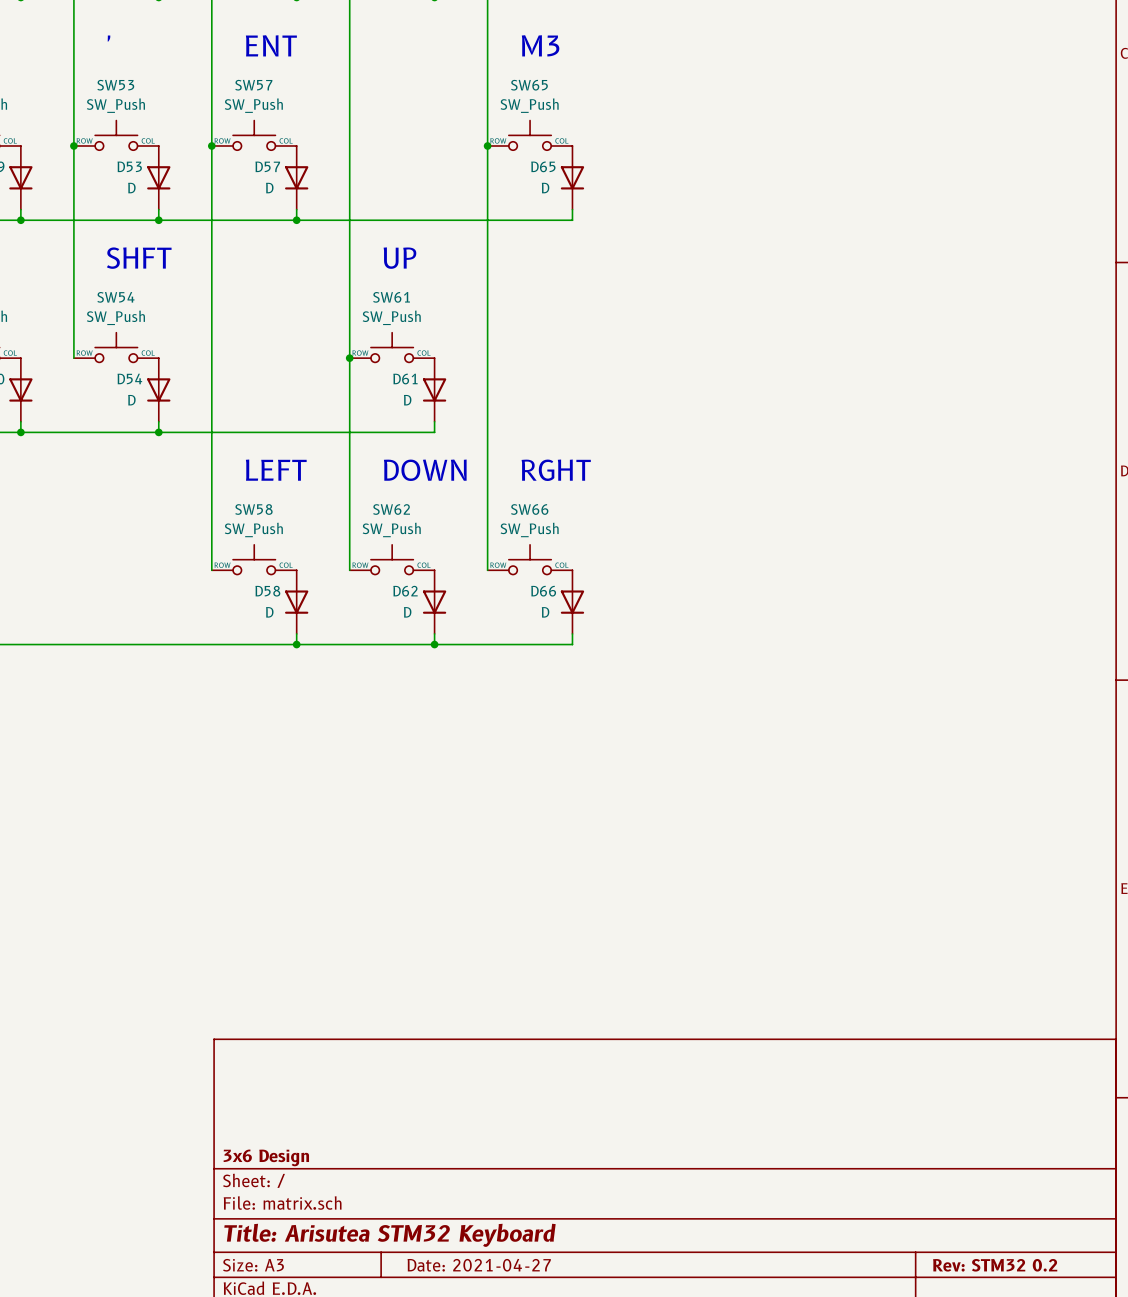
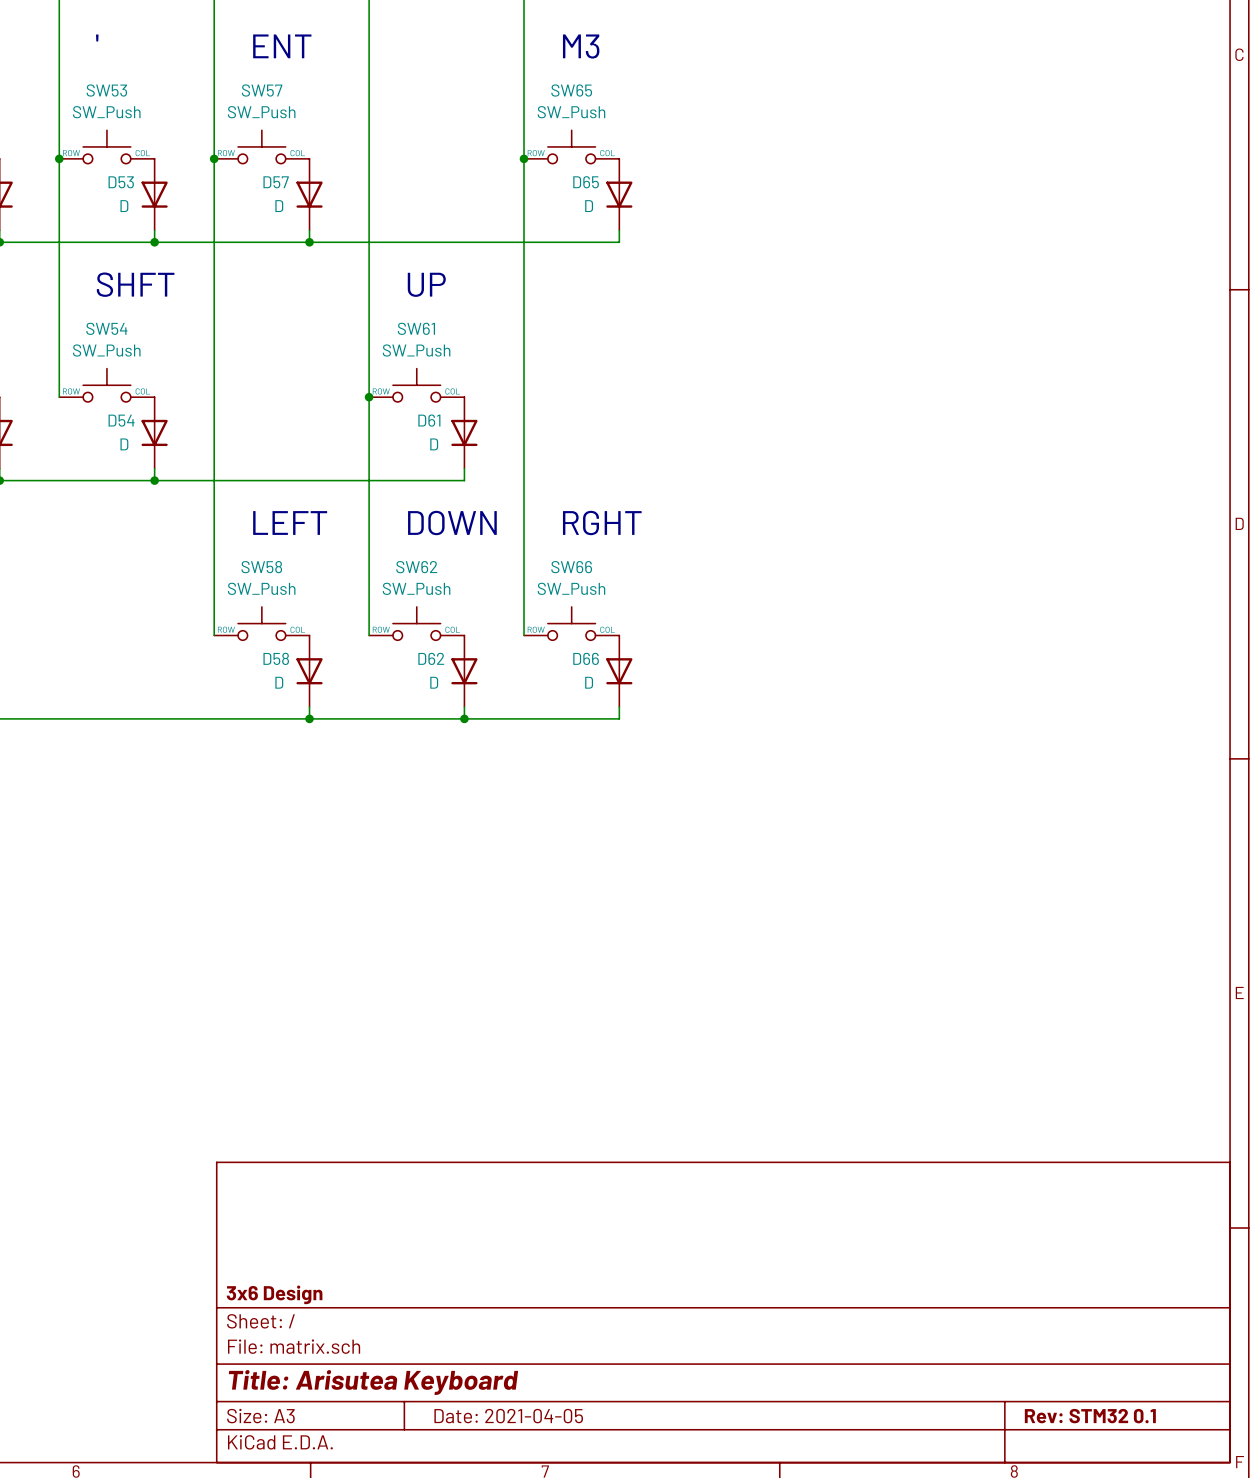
title block: Title: Arisutea STM32 Keyboard (389, 1235) -> Title: Arisutea Keyboard (373, 1382)
title block: Date: 2021-04-27 (479, 1265) -> Date: 2021-04-05 (508, 1416)
title block: Rev: STM32 0.2 (995, 1265) -> Rev: STM32 0.1 (1090, 1416)

